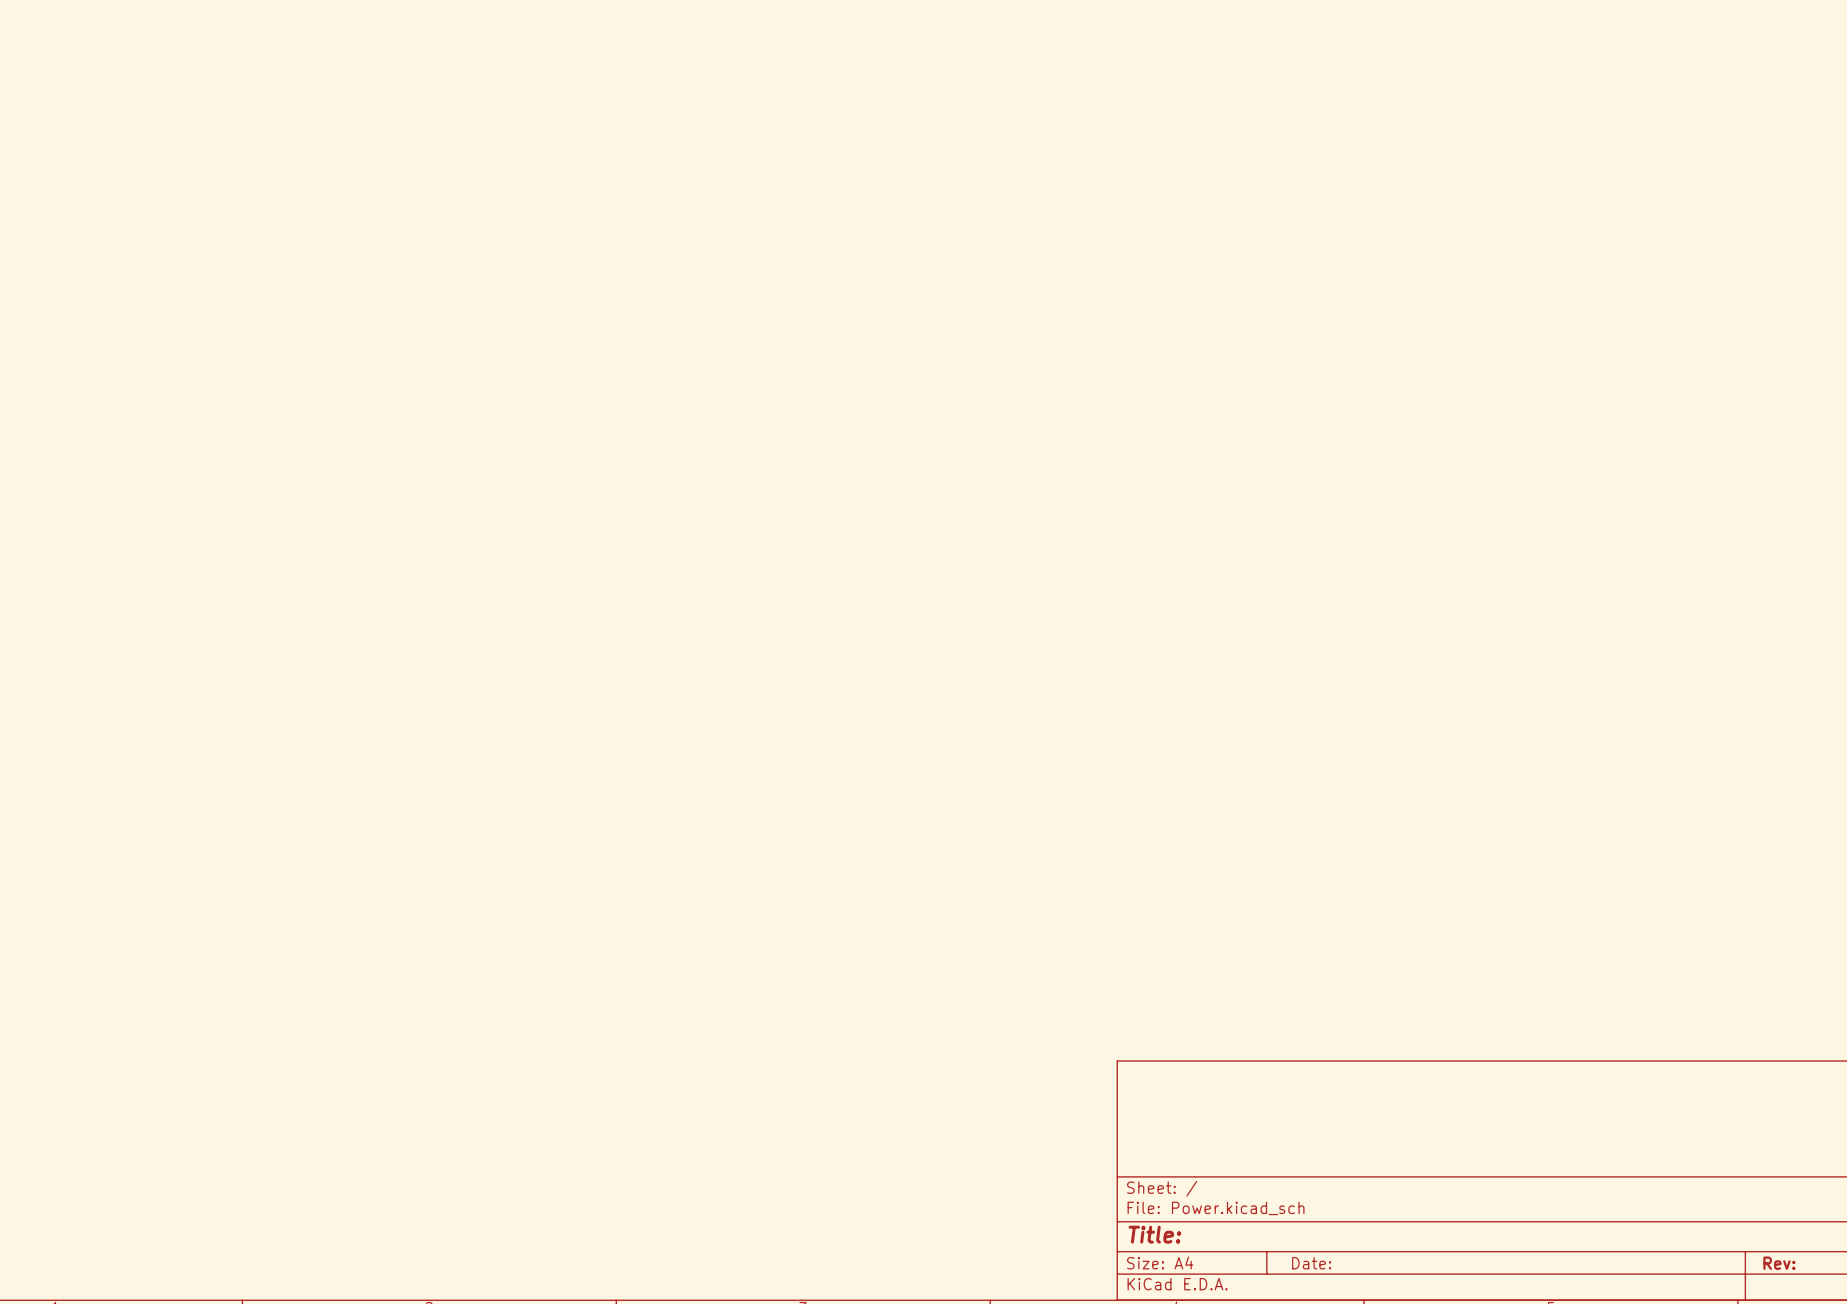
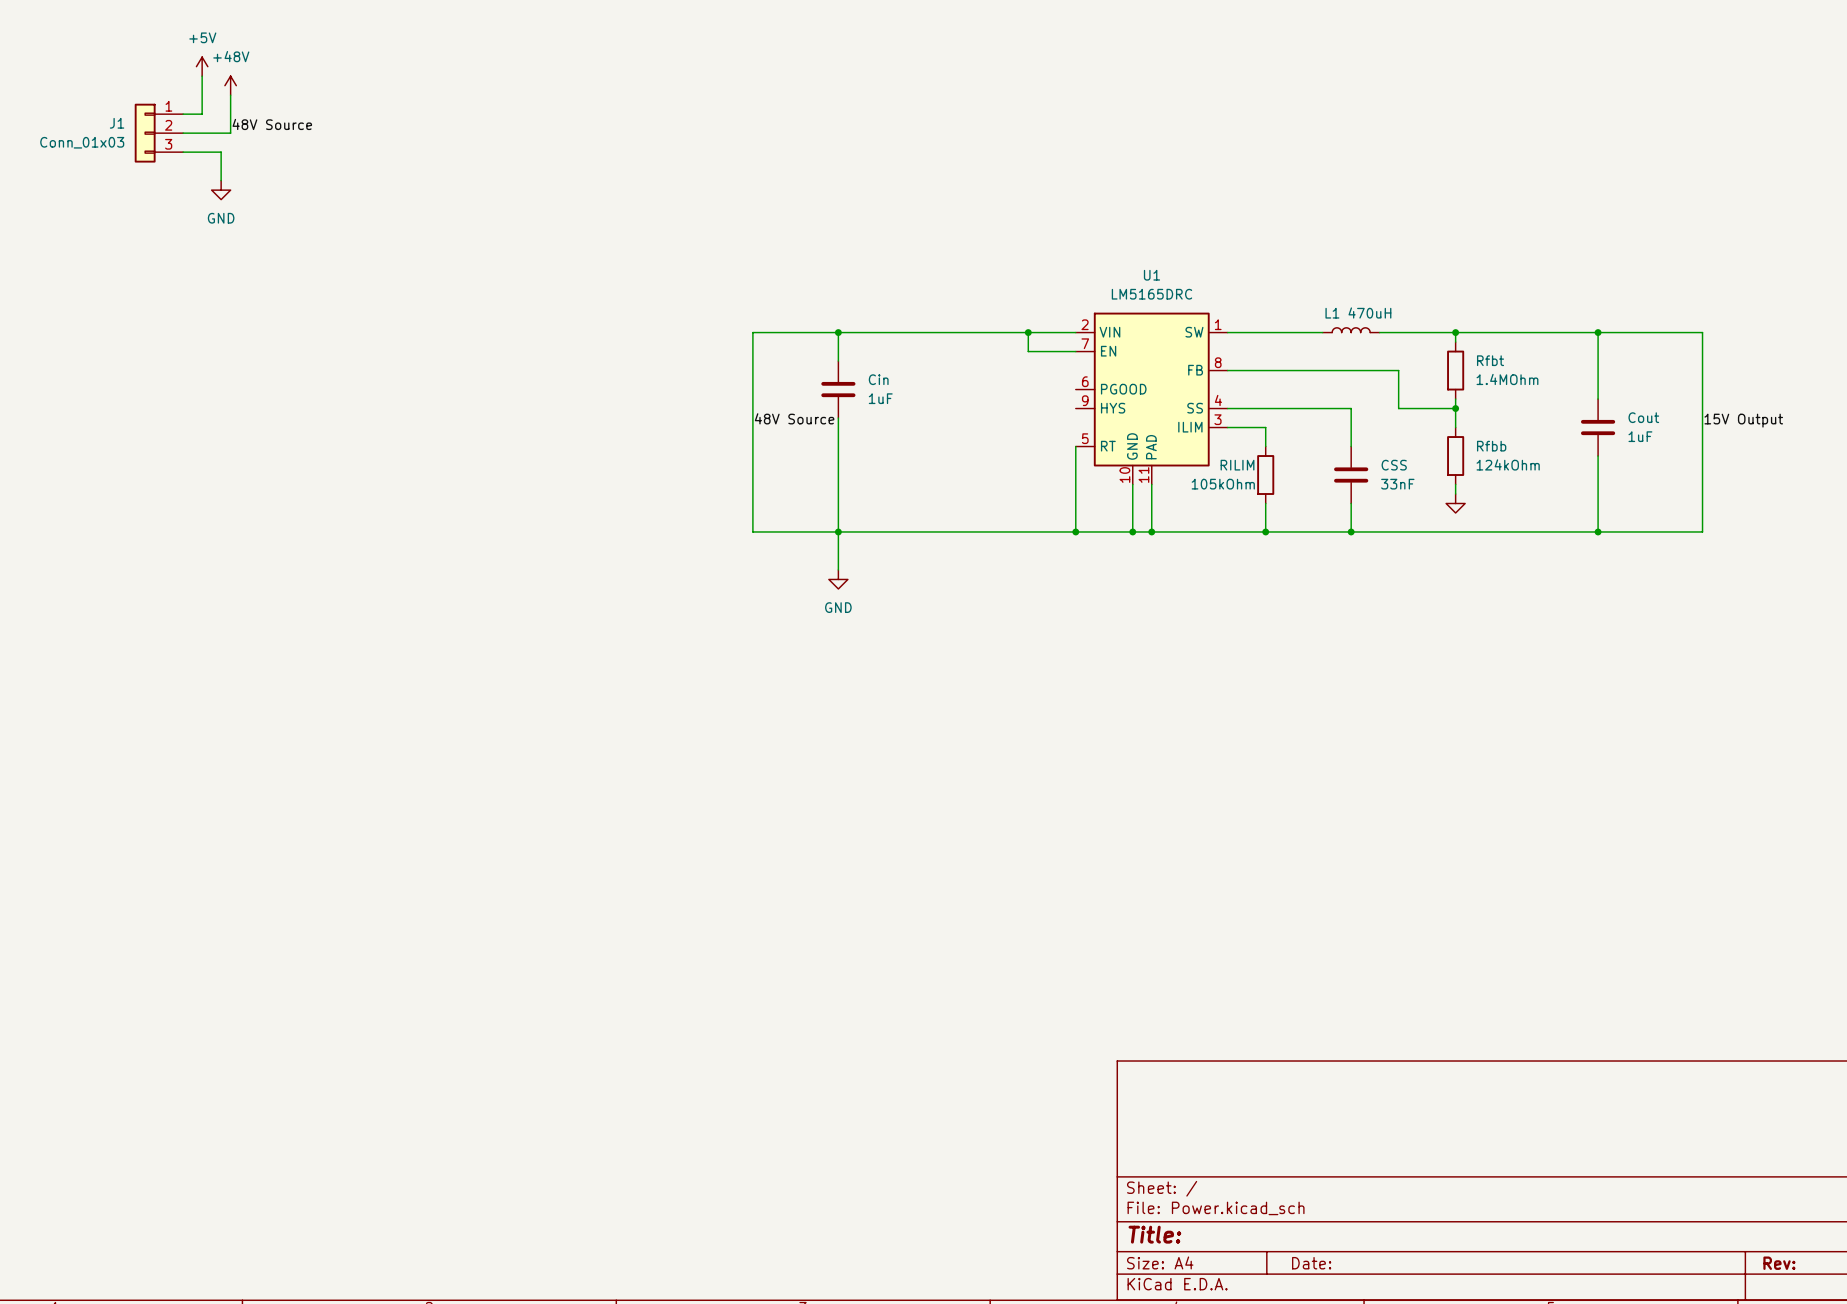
power symbol: none -> +5V (202, 66)
wire: none -> (202, 76) (202, 114) (183, 114)
power symbol: none -> +48V (230, 85)
wire: none -> (230, 95) (230, 133) (183, 133)
label: none -> 48V Source (272, 124)
J1: none -> Conn_01x03 (158, 133)
wire: none -> (183, 152) (221, 152) (221, 180)
power symbol: none -> GND (221, 190)
L1: none -> 470uH (1351, 330)
wire: none -> (838, 332) (838, 361)
junction: none -> (838, 332)
wire: none -> (1028, 332) (1028, 351) (1075, 351)
junction: none -> (1028, 332)
wire: none -> (1075, 332) (752, 332) (752, 531) (1702, 531) (1702, 332) (1379, 332)
wire: none -> (1227, 332) (1322, 332)
wire: none -> (1455, 332) (1455, 342)
junction: none -> (1455, 332)
wire: none -> (1598, 332) (1598, 399)
junction: none -> (1598, 332)
wire: none -> (1227, 370) (1398, 370) (1398, 408) (1455, 408)
Rfbt: none -> 1.4MOhm (1455, 370)
Cin: none -> 1uF (838, 389)
U1: none -> LM5165DRC (1151, 398)
wire: none -> (1455, 399) (1455, 427)
wire: none -> (1227, 408) (1351, 408) (1351, 446)
junction: none -> (1455, 408)
label: none -> 48V Source (794, 418)
wire: none -> (838, 418) (838, 569)
label: none -> 15V Output (1743, 420)
wire: none -> (1227, 427) (1265, 427) (1265, 446)
Cout: none -> 1uF (1598, 427)
wire: none -> (1075, 446) (1075, 531)
Rfbb: none -> 124kOhm (1455, 456)
wire: none -> (1598, 456) (1598, 531)
RILIM: none -> 105kOhm (1265, 475)
CSS: none -> 33nF (1351, 475)
wire: none -> (1132, 484) (1132, 531)
wire: none -> (1151, 484) (1151, 531)
wire: none -> (1455, 484) (1455, 494)
wire: none -> (1265, 503) (1265, 531)
wire: none -> (1351, 503) (1351, 531)
power symbol: none -> (1455, 503)
junction: none -> (838, 531)
junction: none -> (1075, 531)
junction: none -> (1132, 531)
junction: none -> (1151, 531)
junction: none -> (1265, 531)
junction: none -> (1351, 531)
junction: none -> (1598, 531)
power symbol: none -> GND (838, 579)

